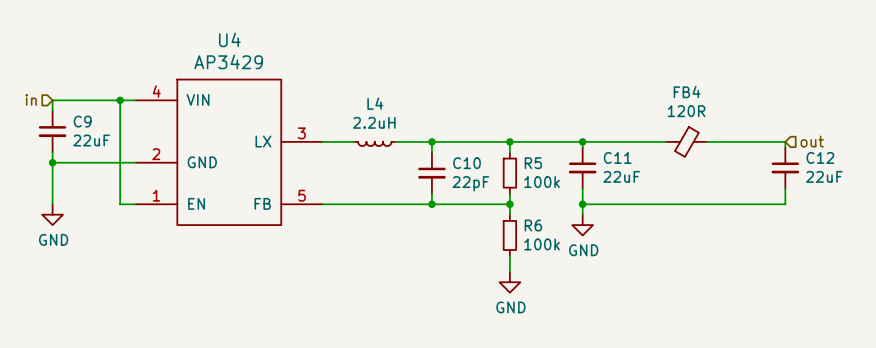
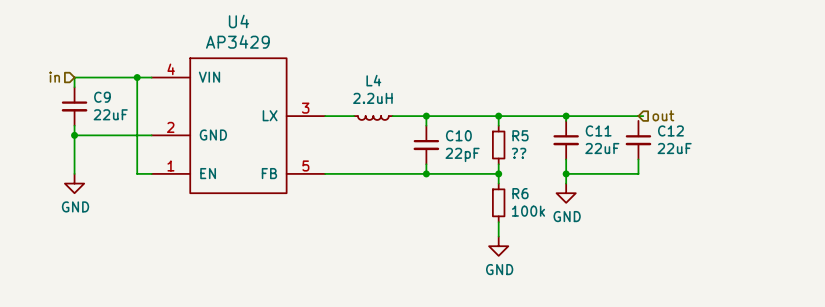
FB4: 120R (686, 141) -> none
wire: (707, 141) (785, 141) (785, 147) -> none
hierarchical label position: out (812, 141) -> out (663, 115)
C12 position: (785, 167) -> (638, 140)
R5 value: 100k (542, 182) -> ?? (519, 153)
wire: (785, 188) (785, 204) (660, 204) -> (638, 159) (638, 173)

